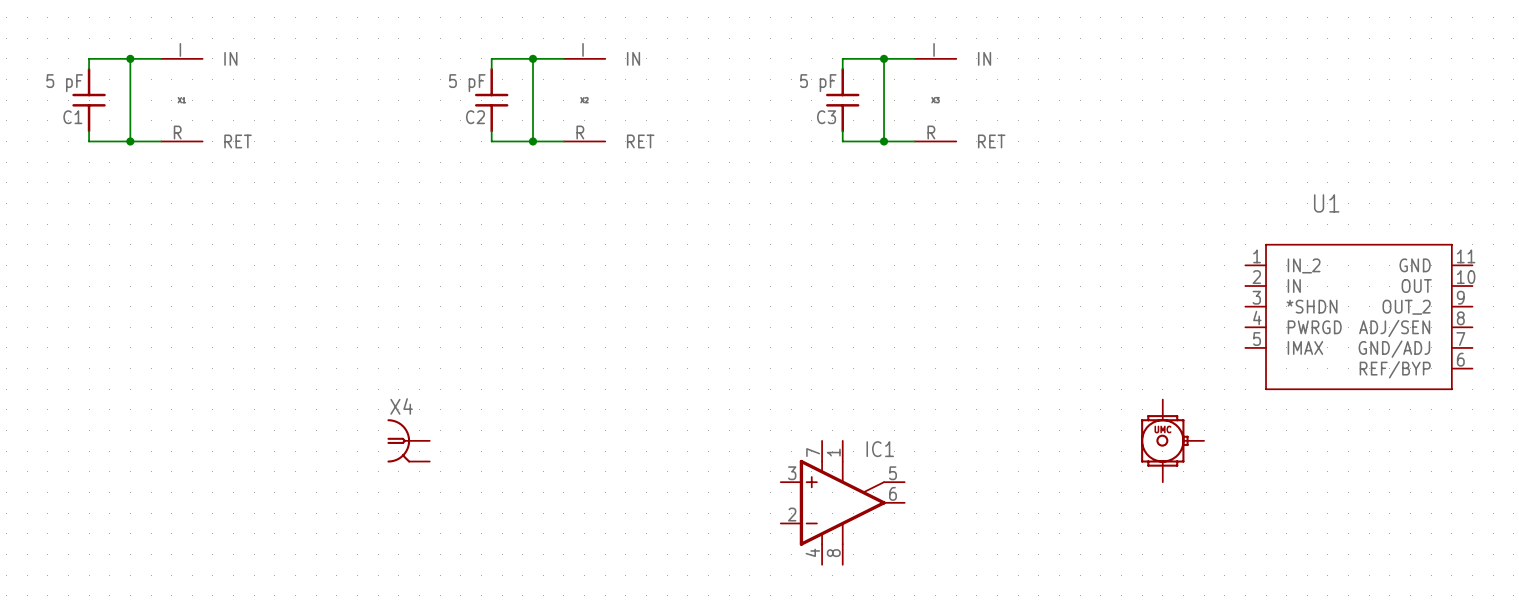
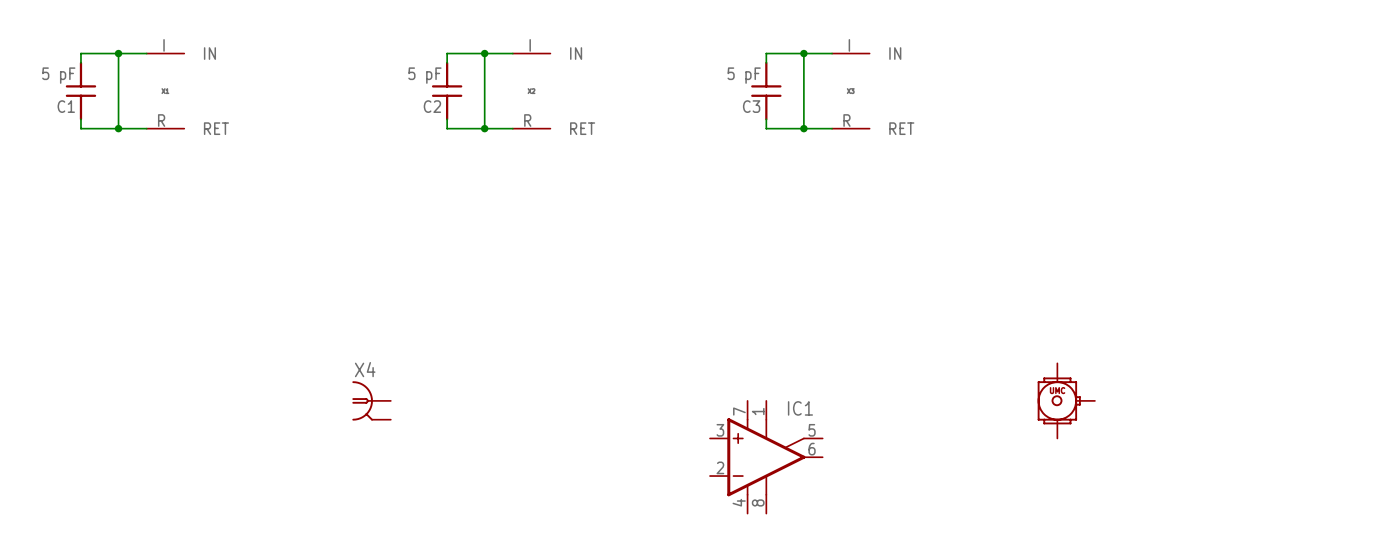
U1: (1358, 316) -> none

